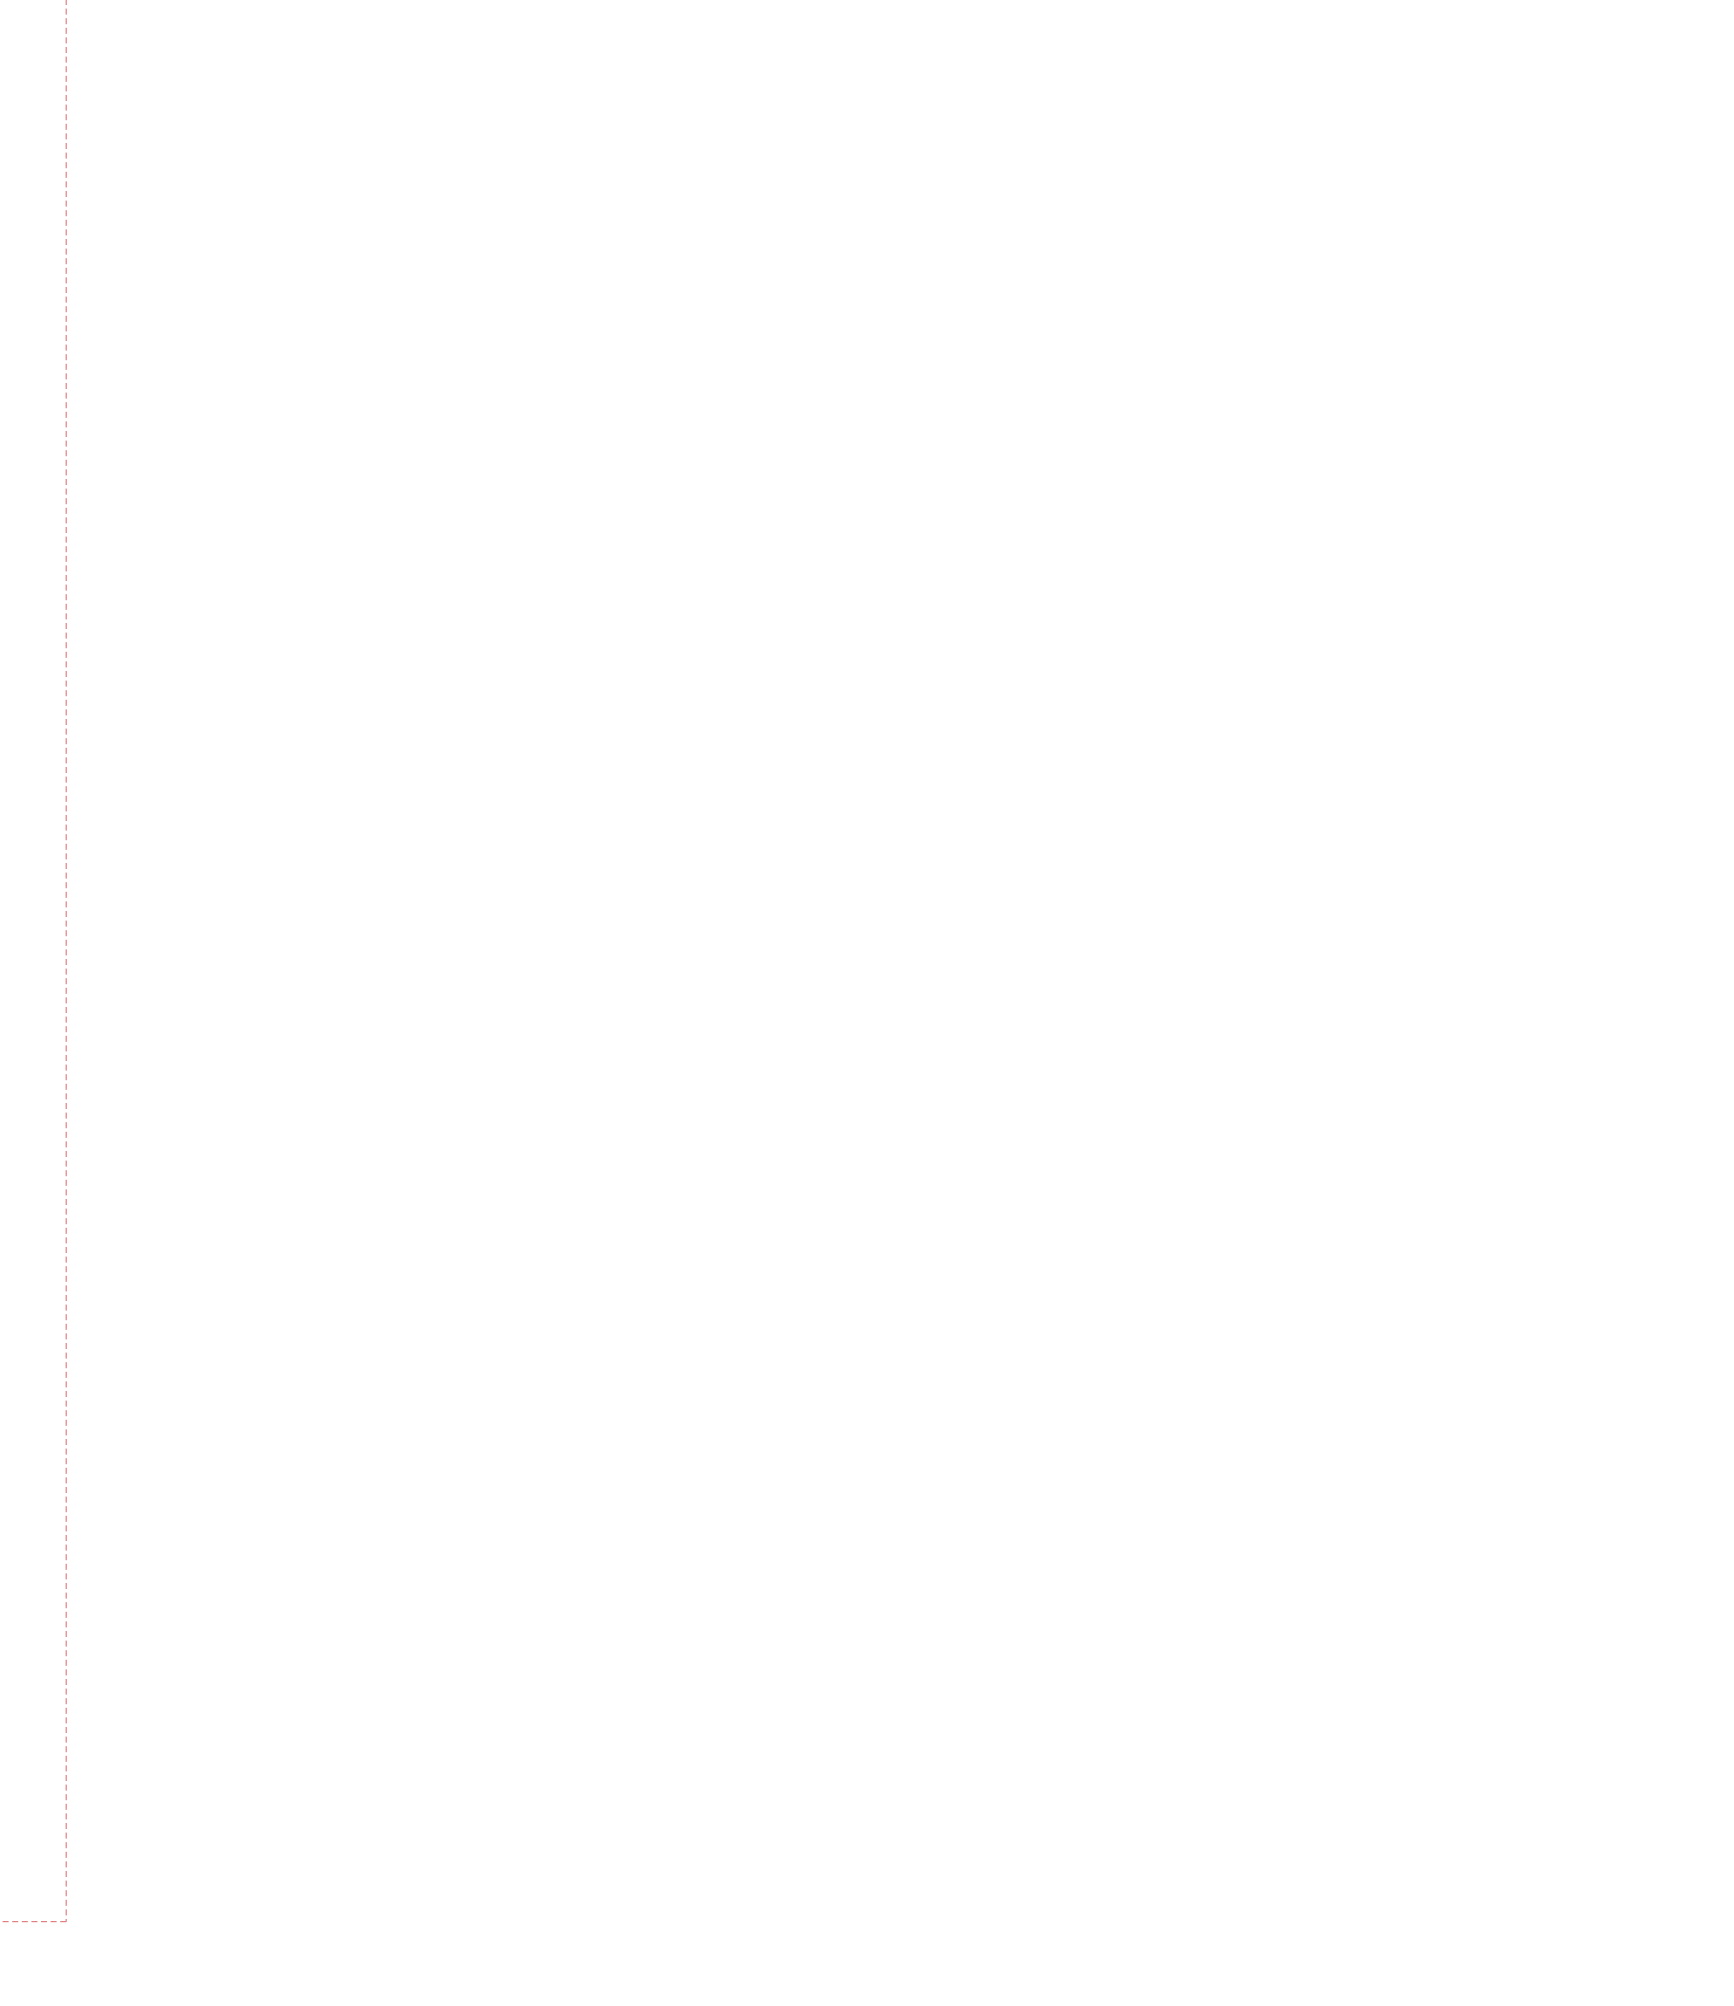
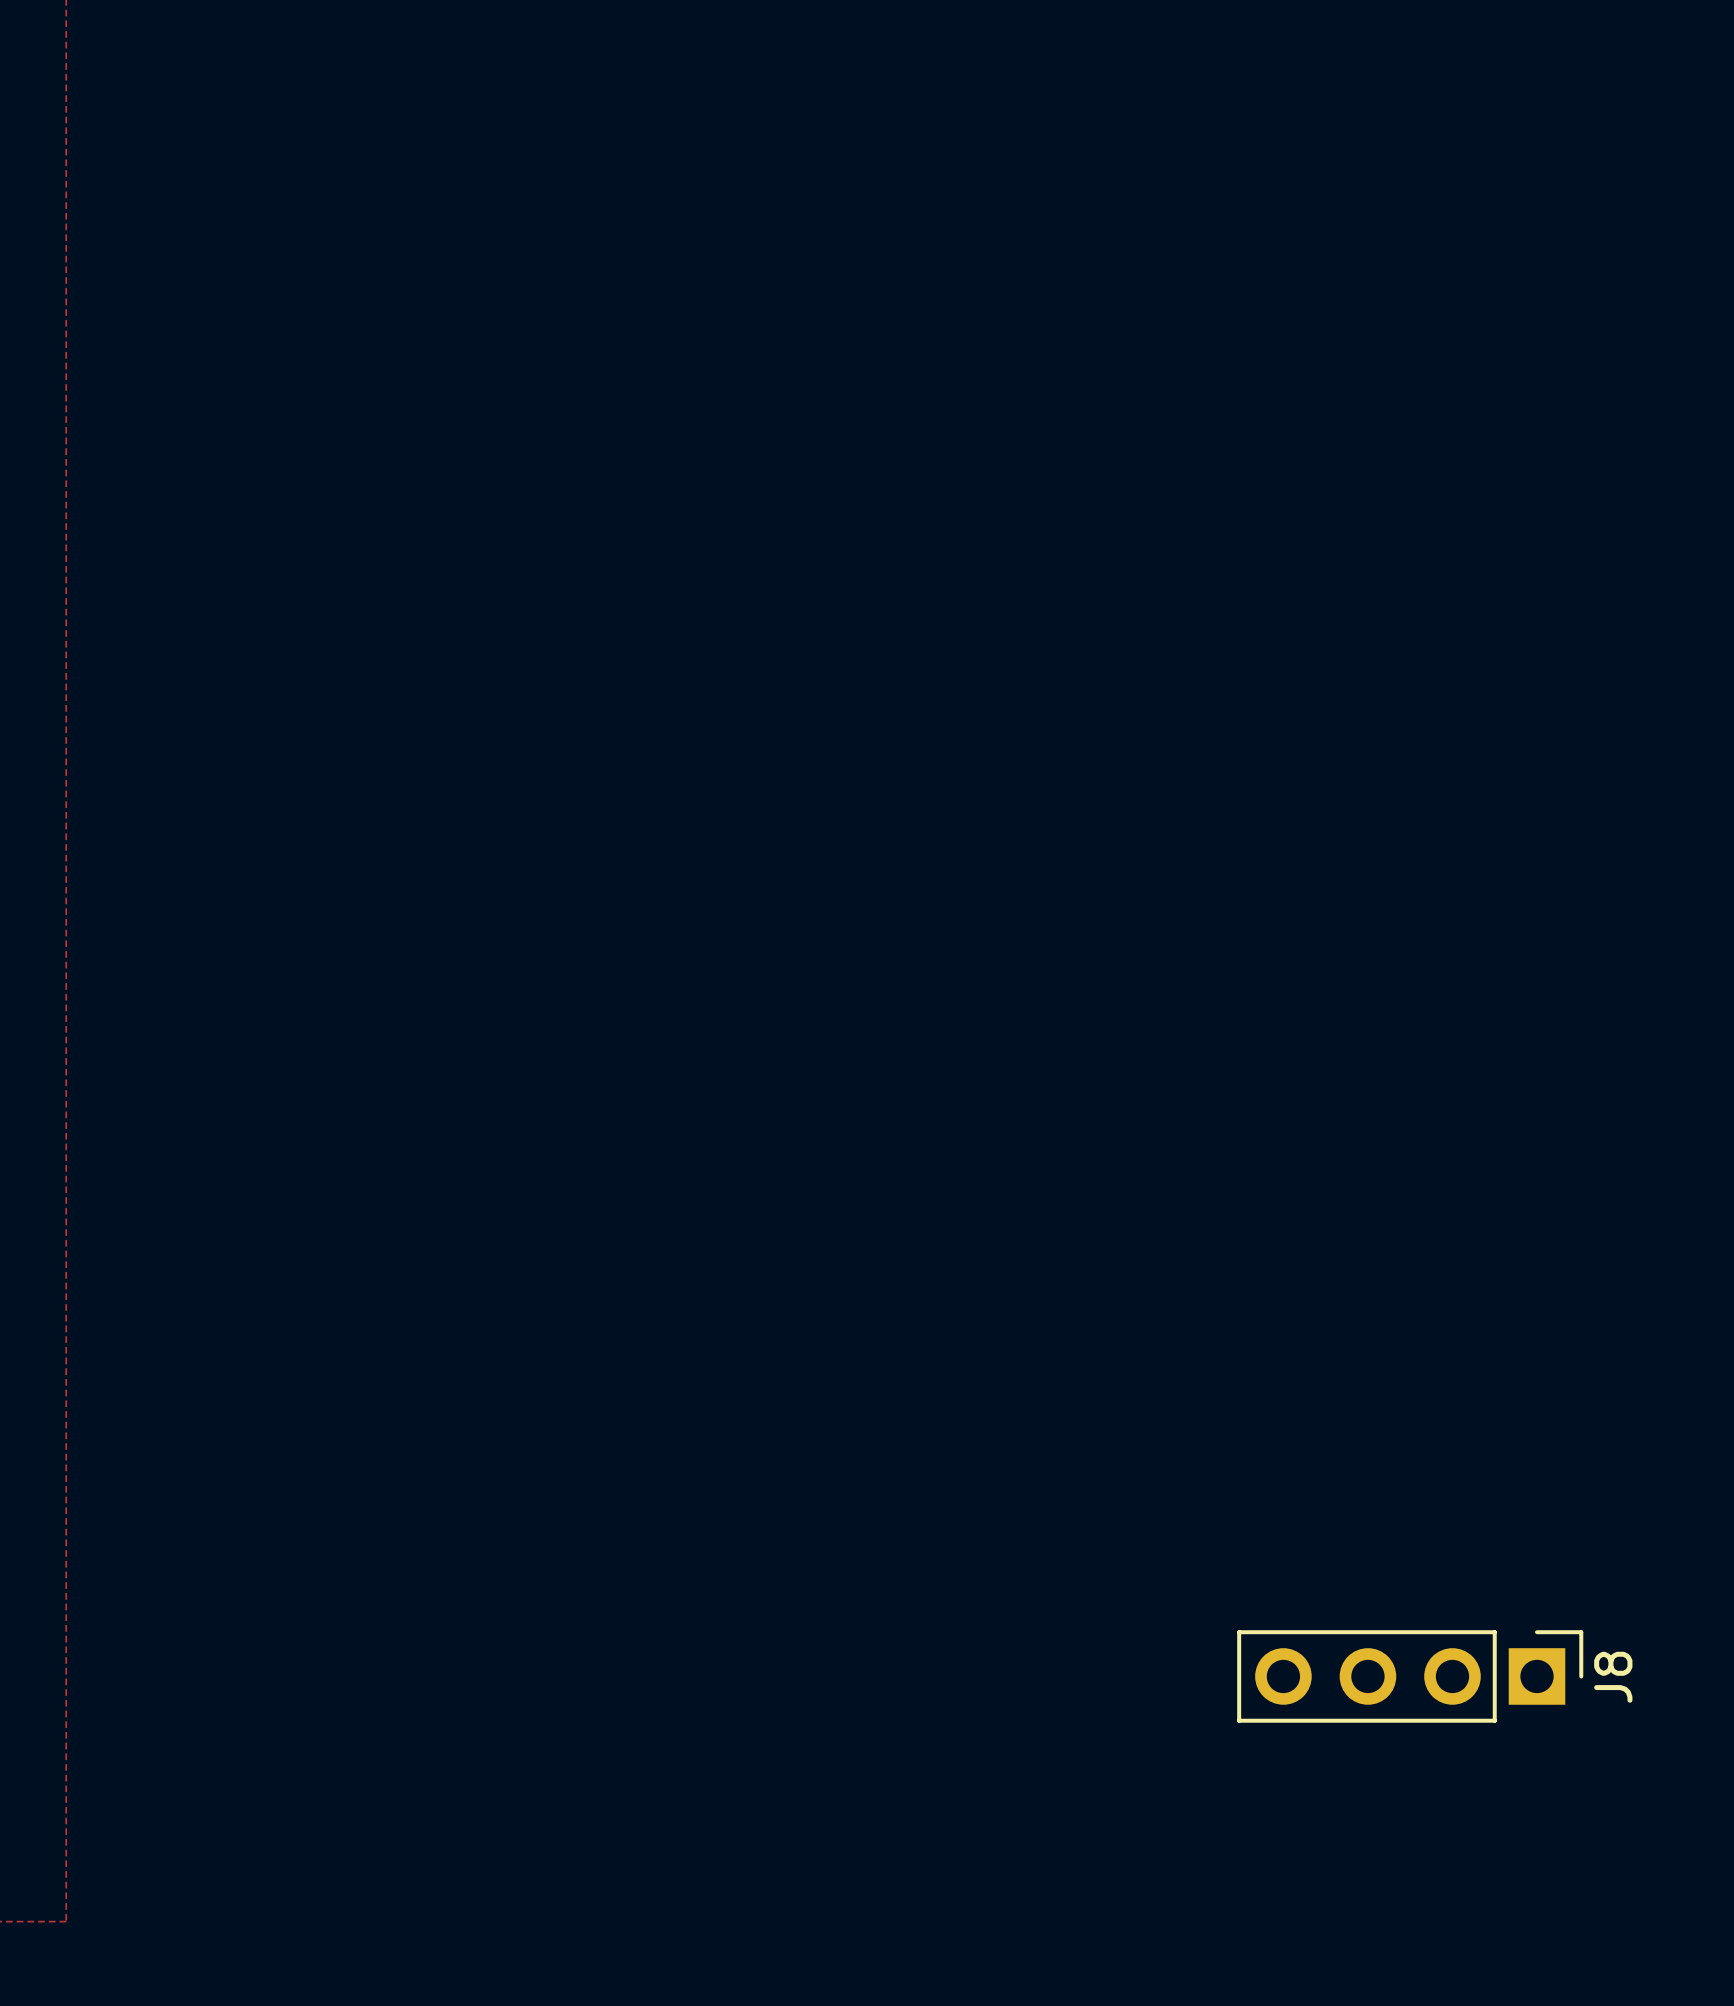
J8: none -> (1410, 1676)

